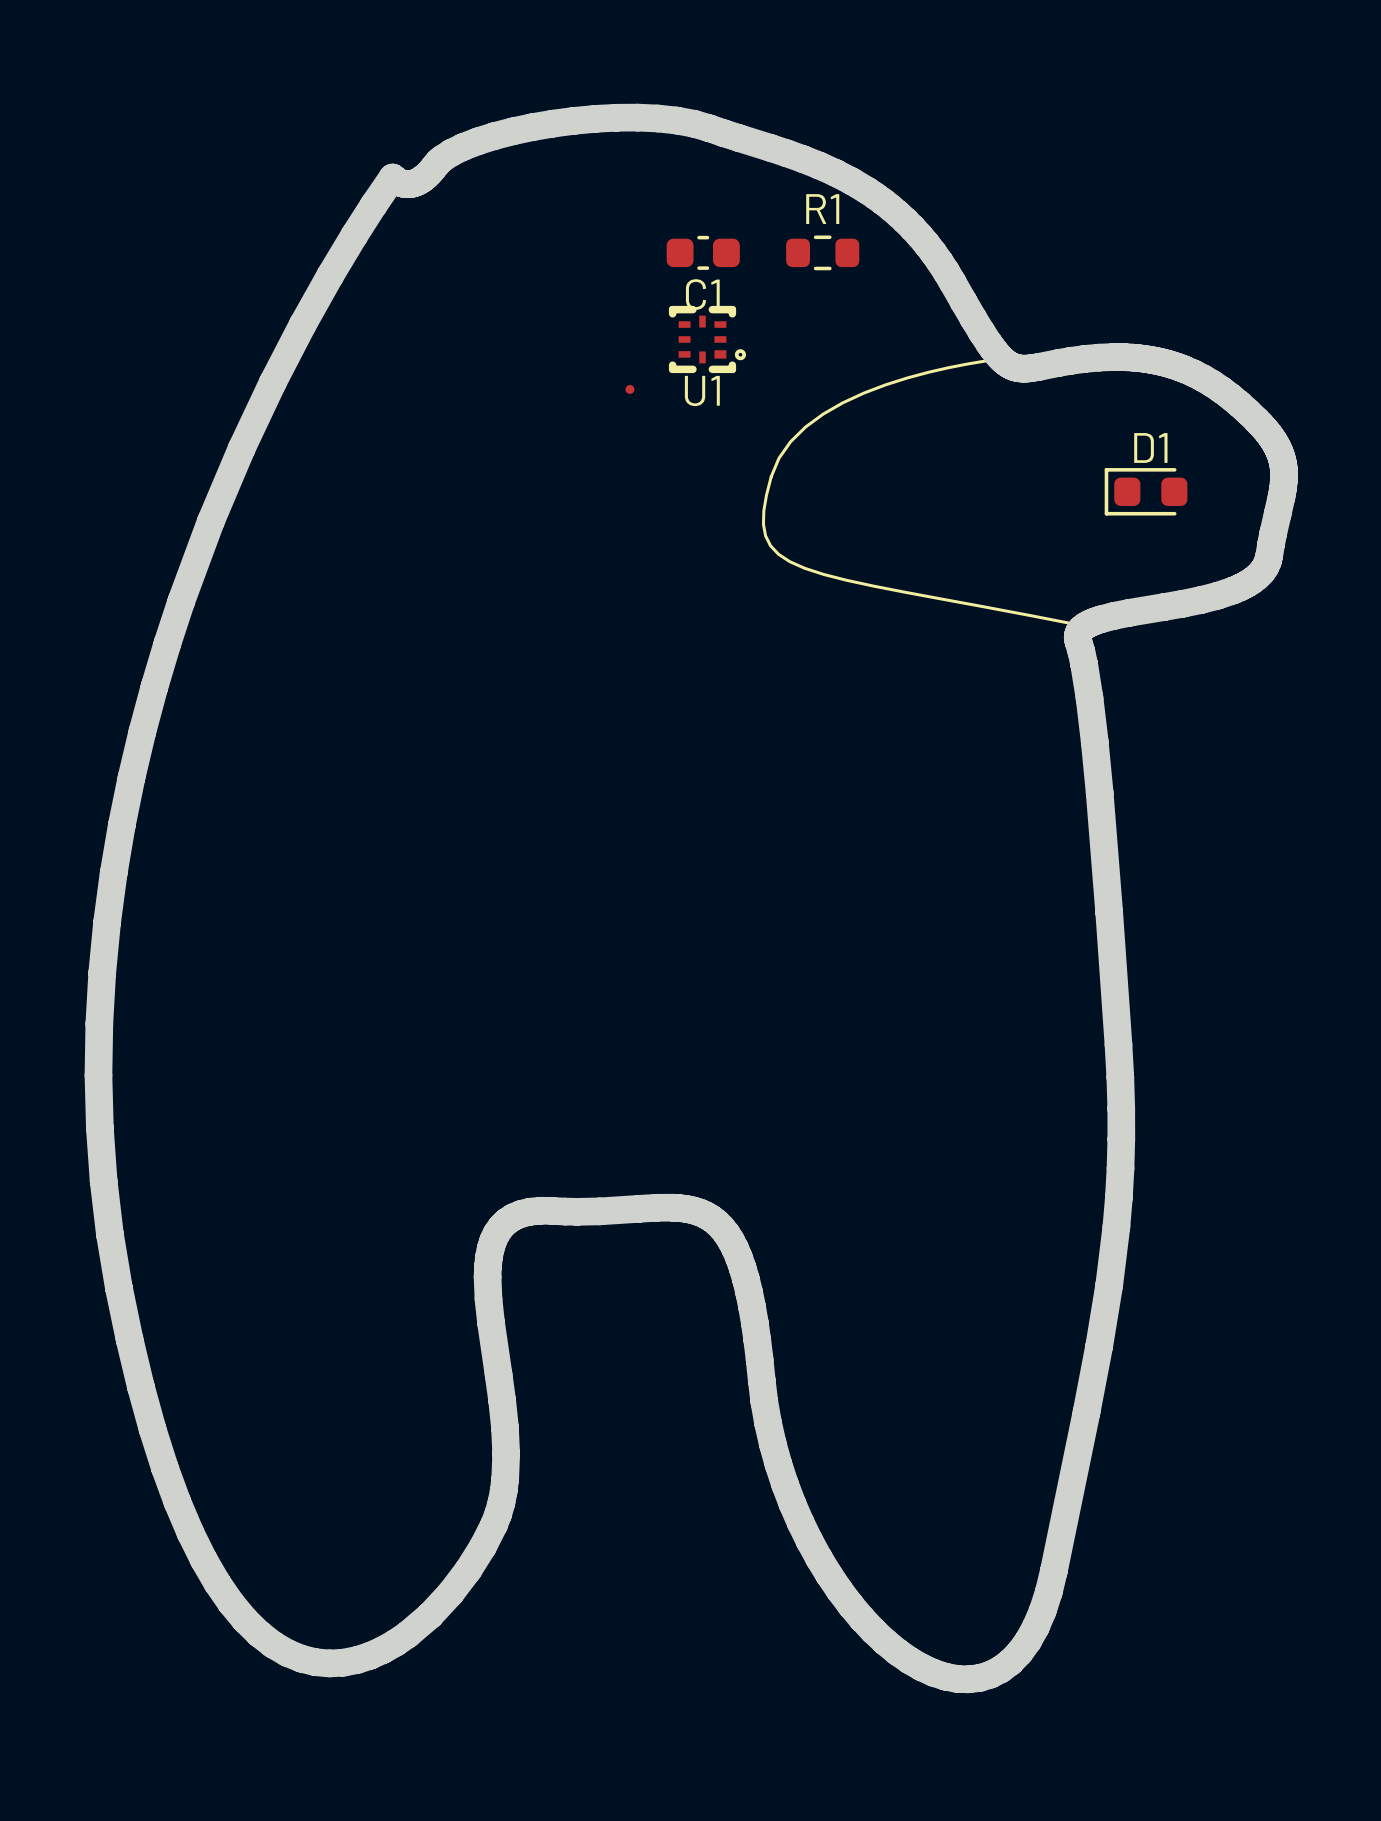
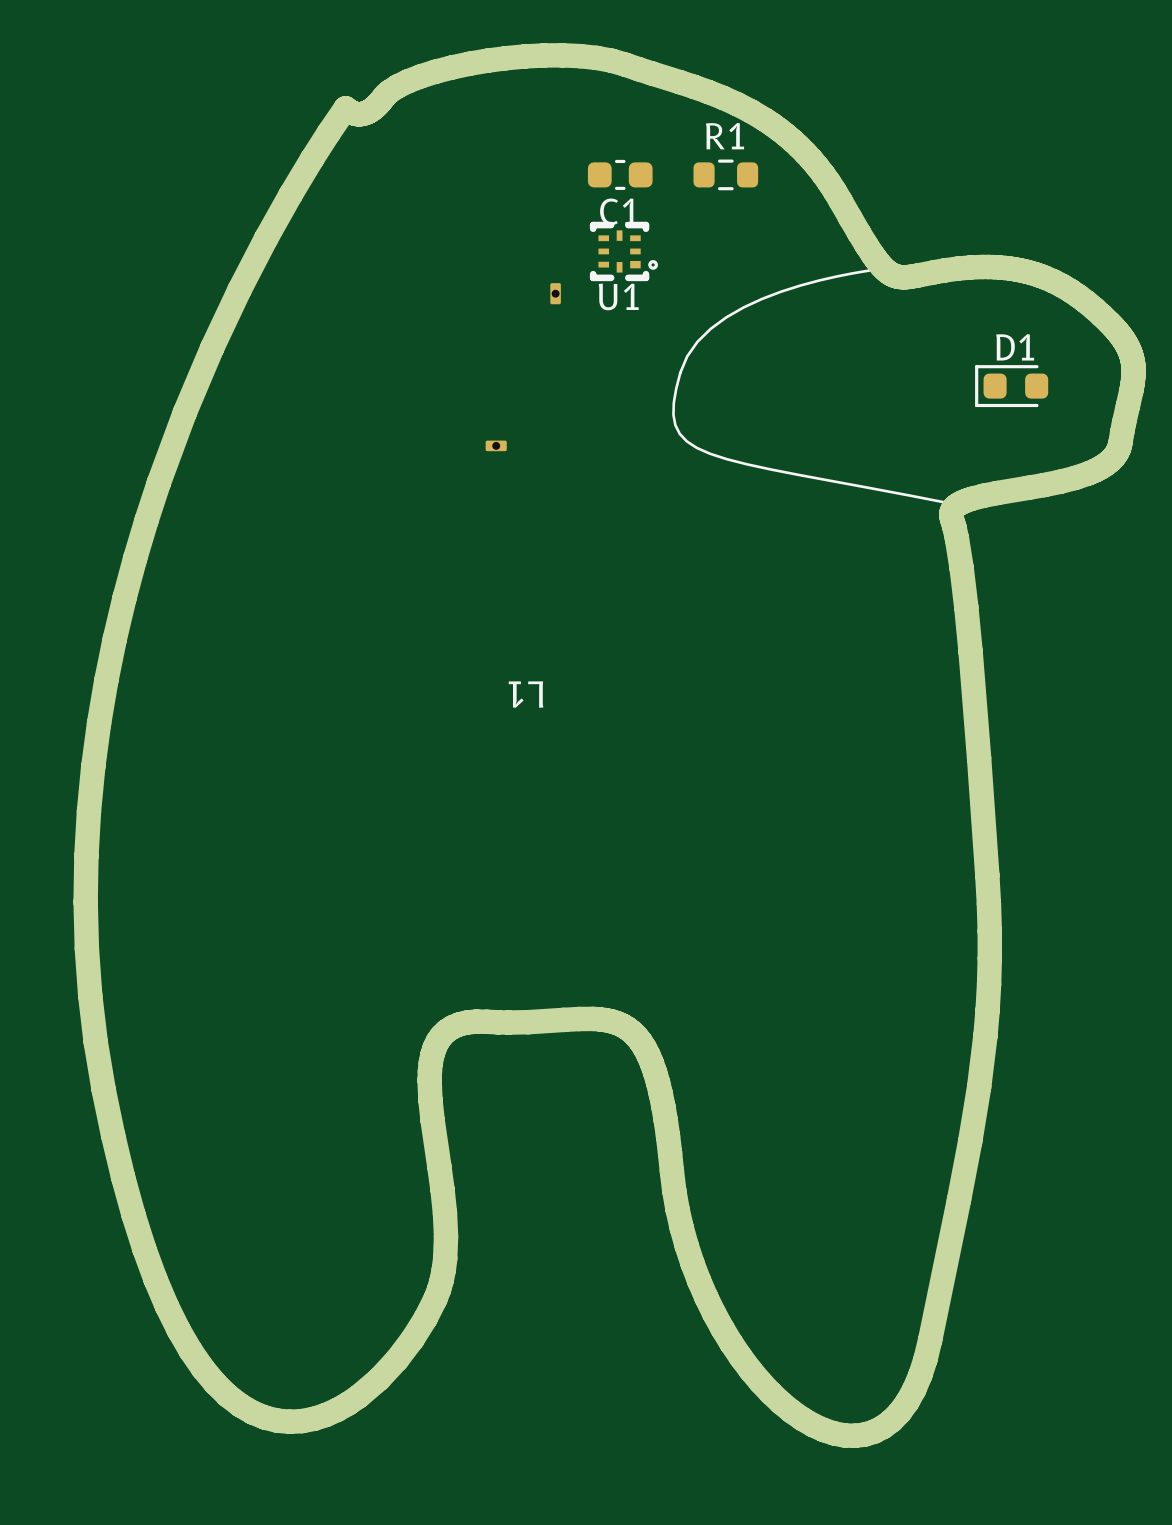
part: (629, 389) -> none
L1: none -> (523, 367)

